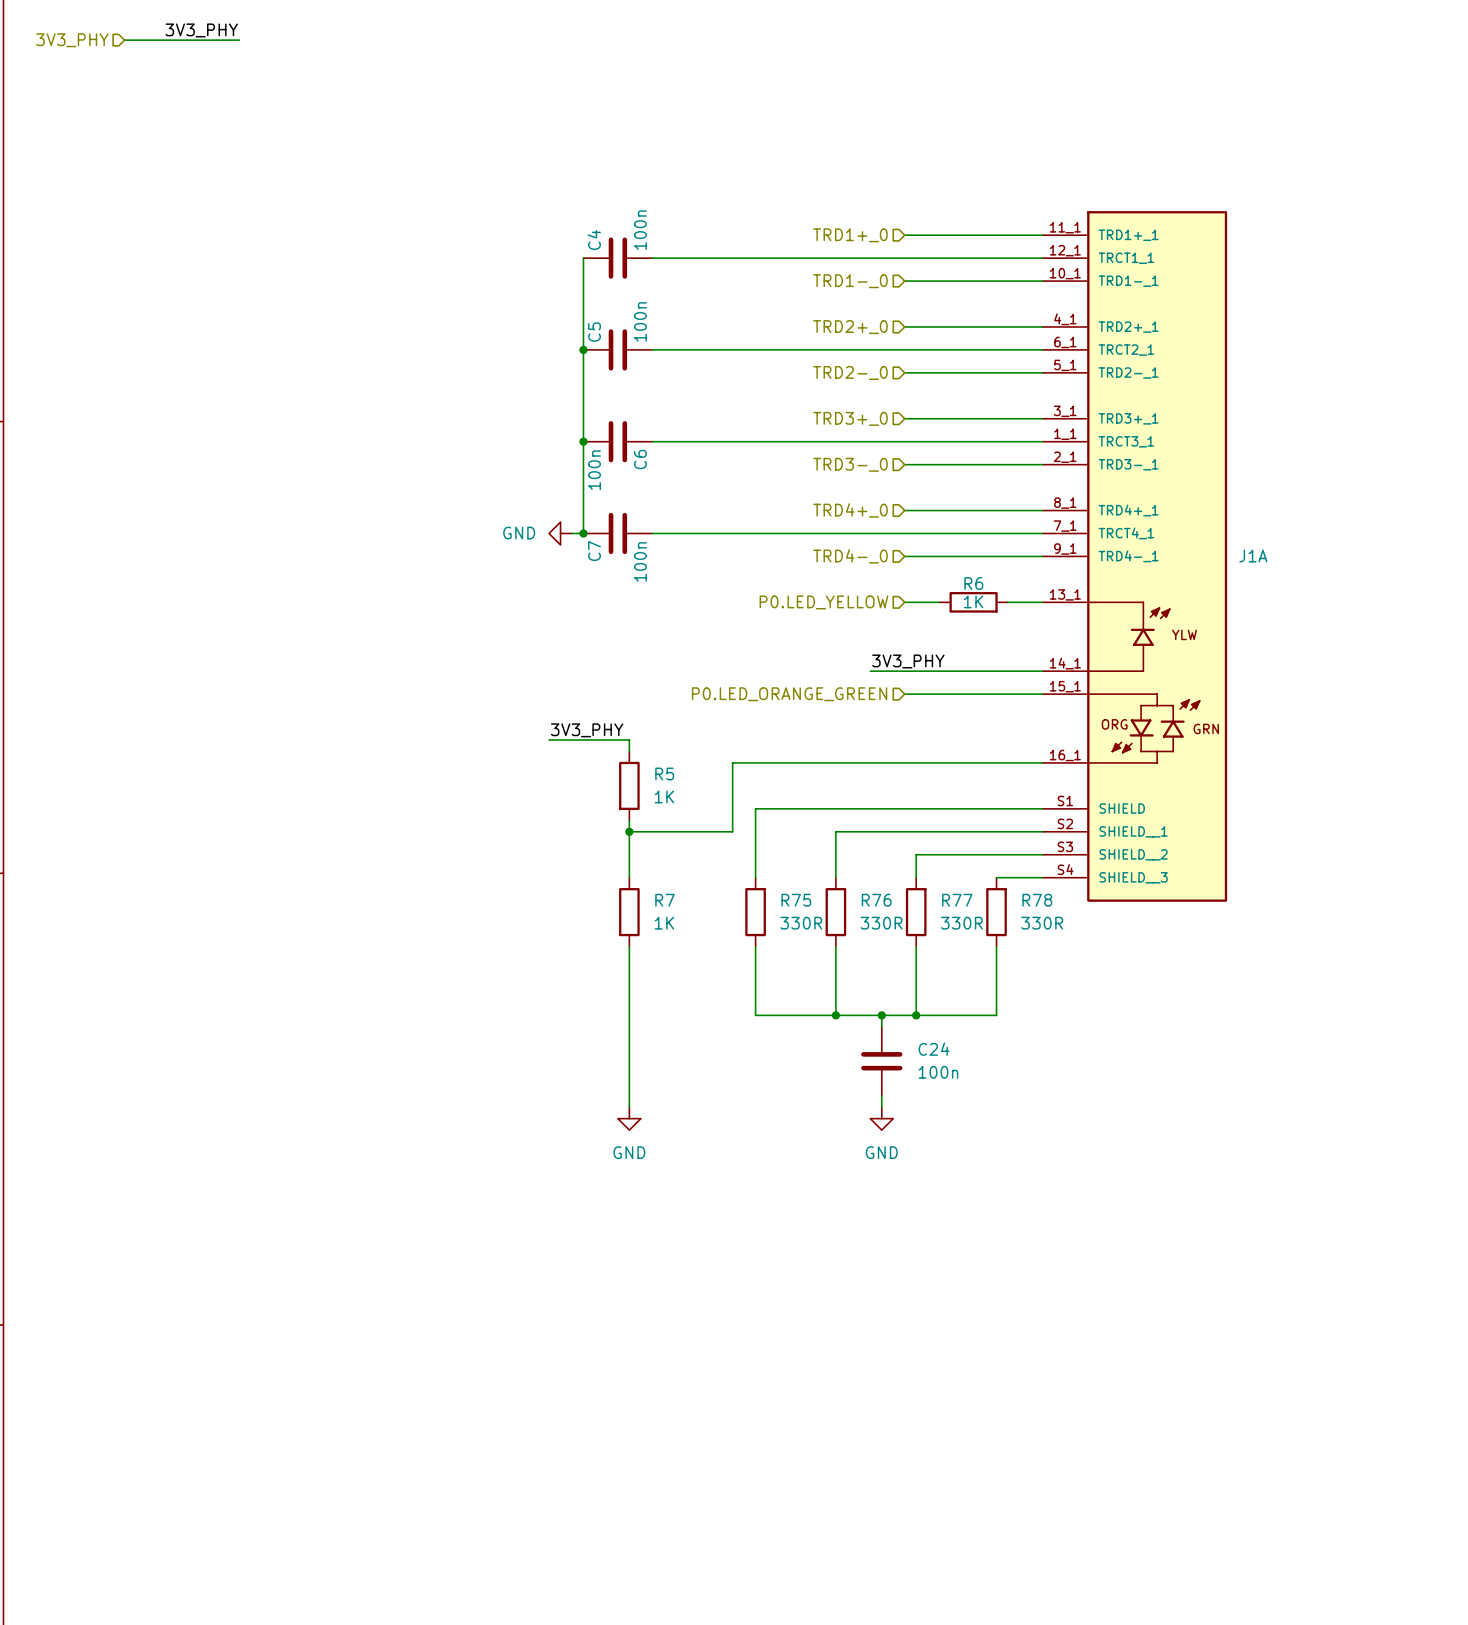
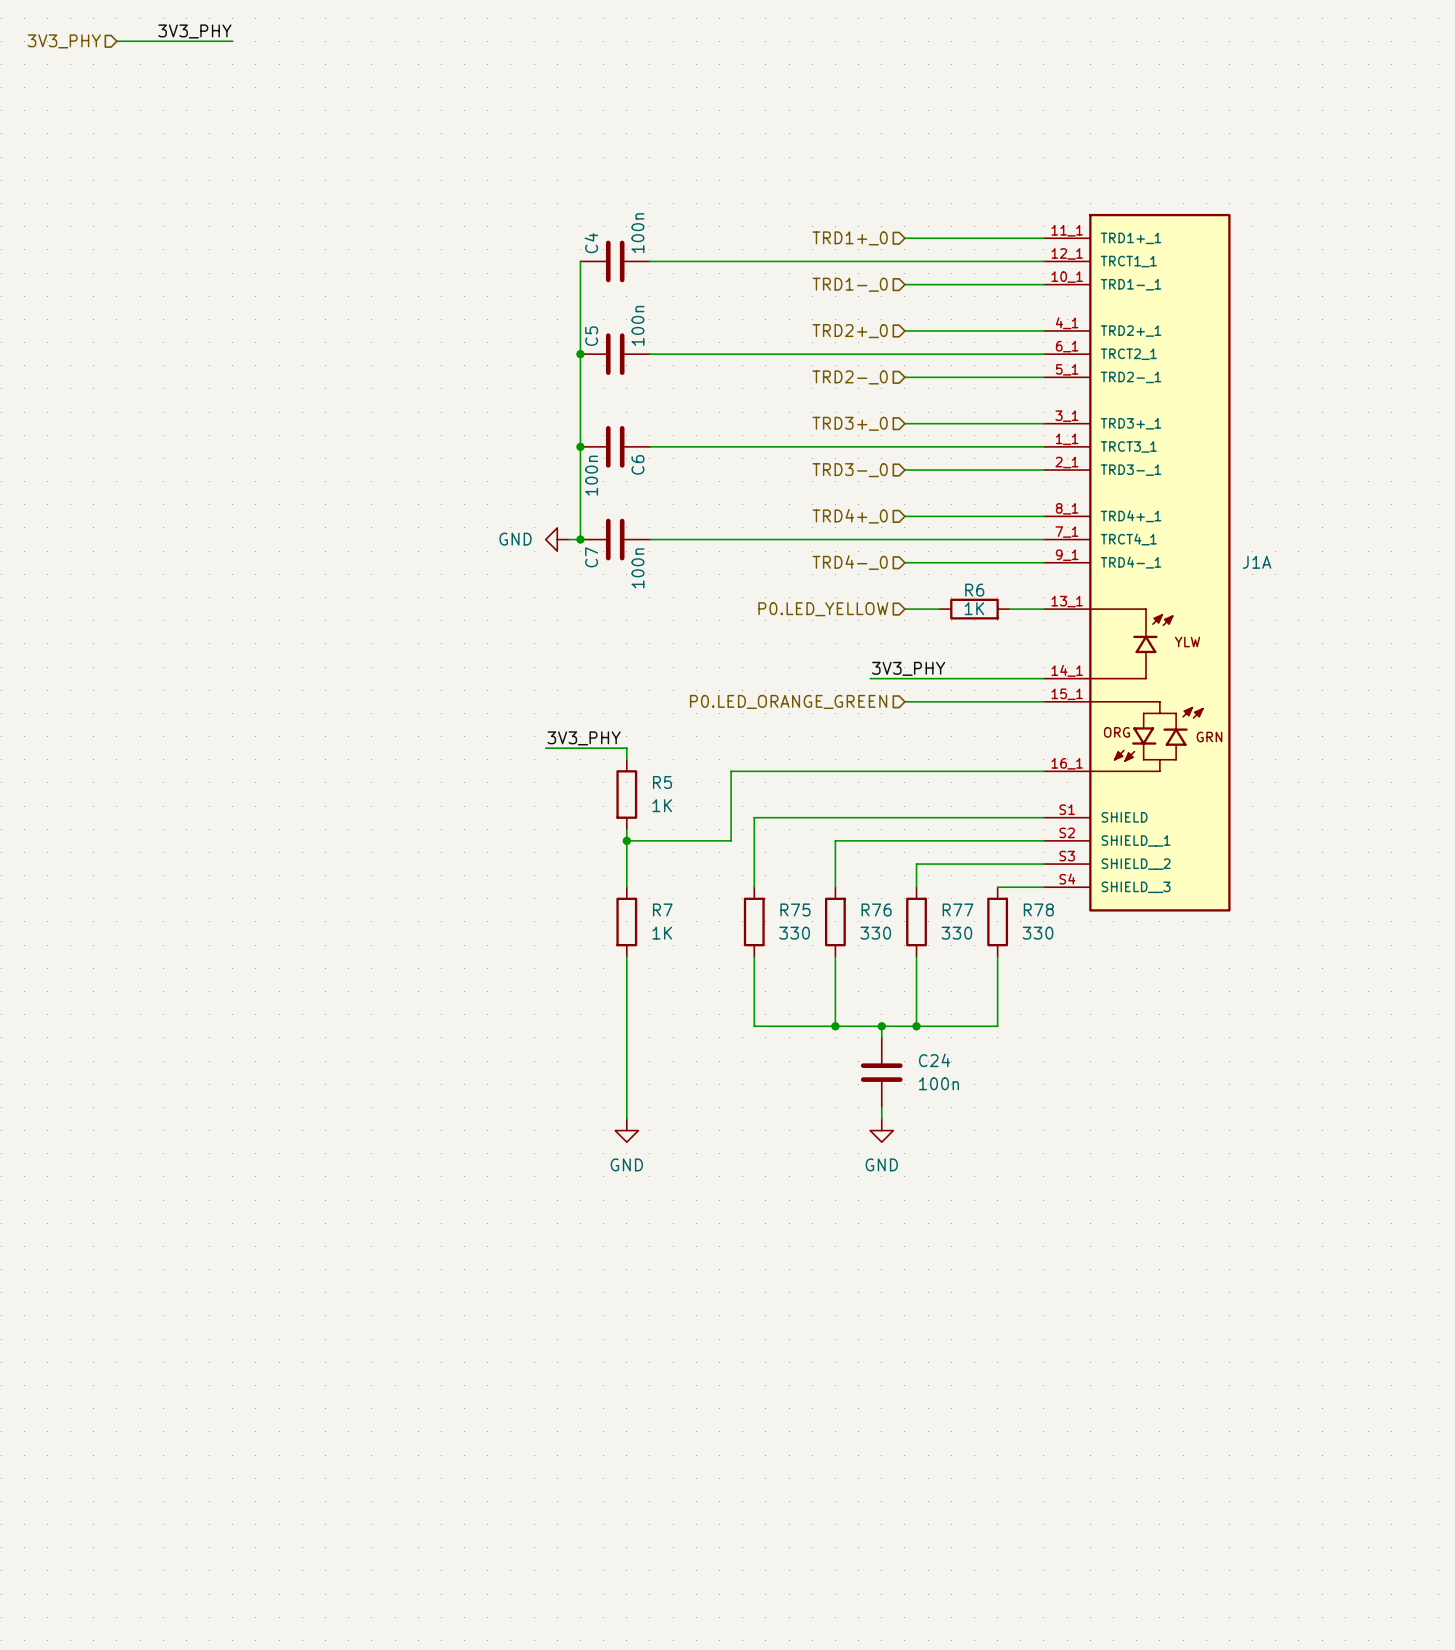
R75 value: 330R (801, 923) -> 330 (794, 933)
R76 value: 330R (881, 923) -> 330 (875, 933)
R77 value: 330R (961, 923) -> 330 (956, 933)
R78 value: 330R (1042, 923) -> 330 (1038, 933)

